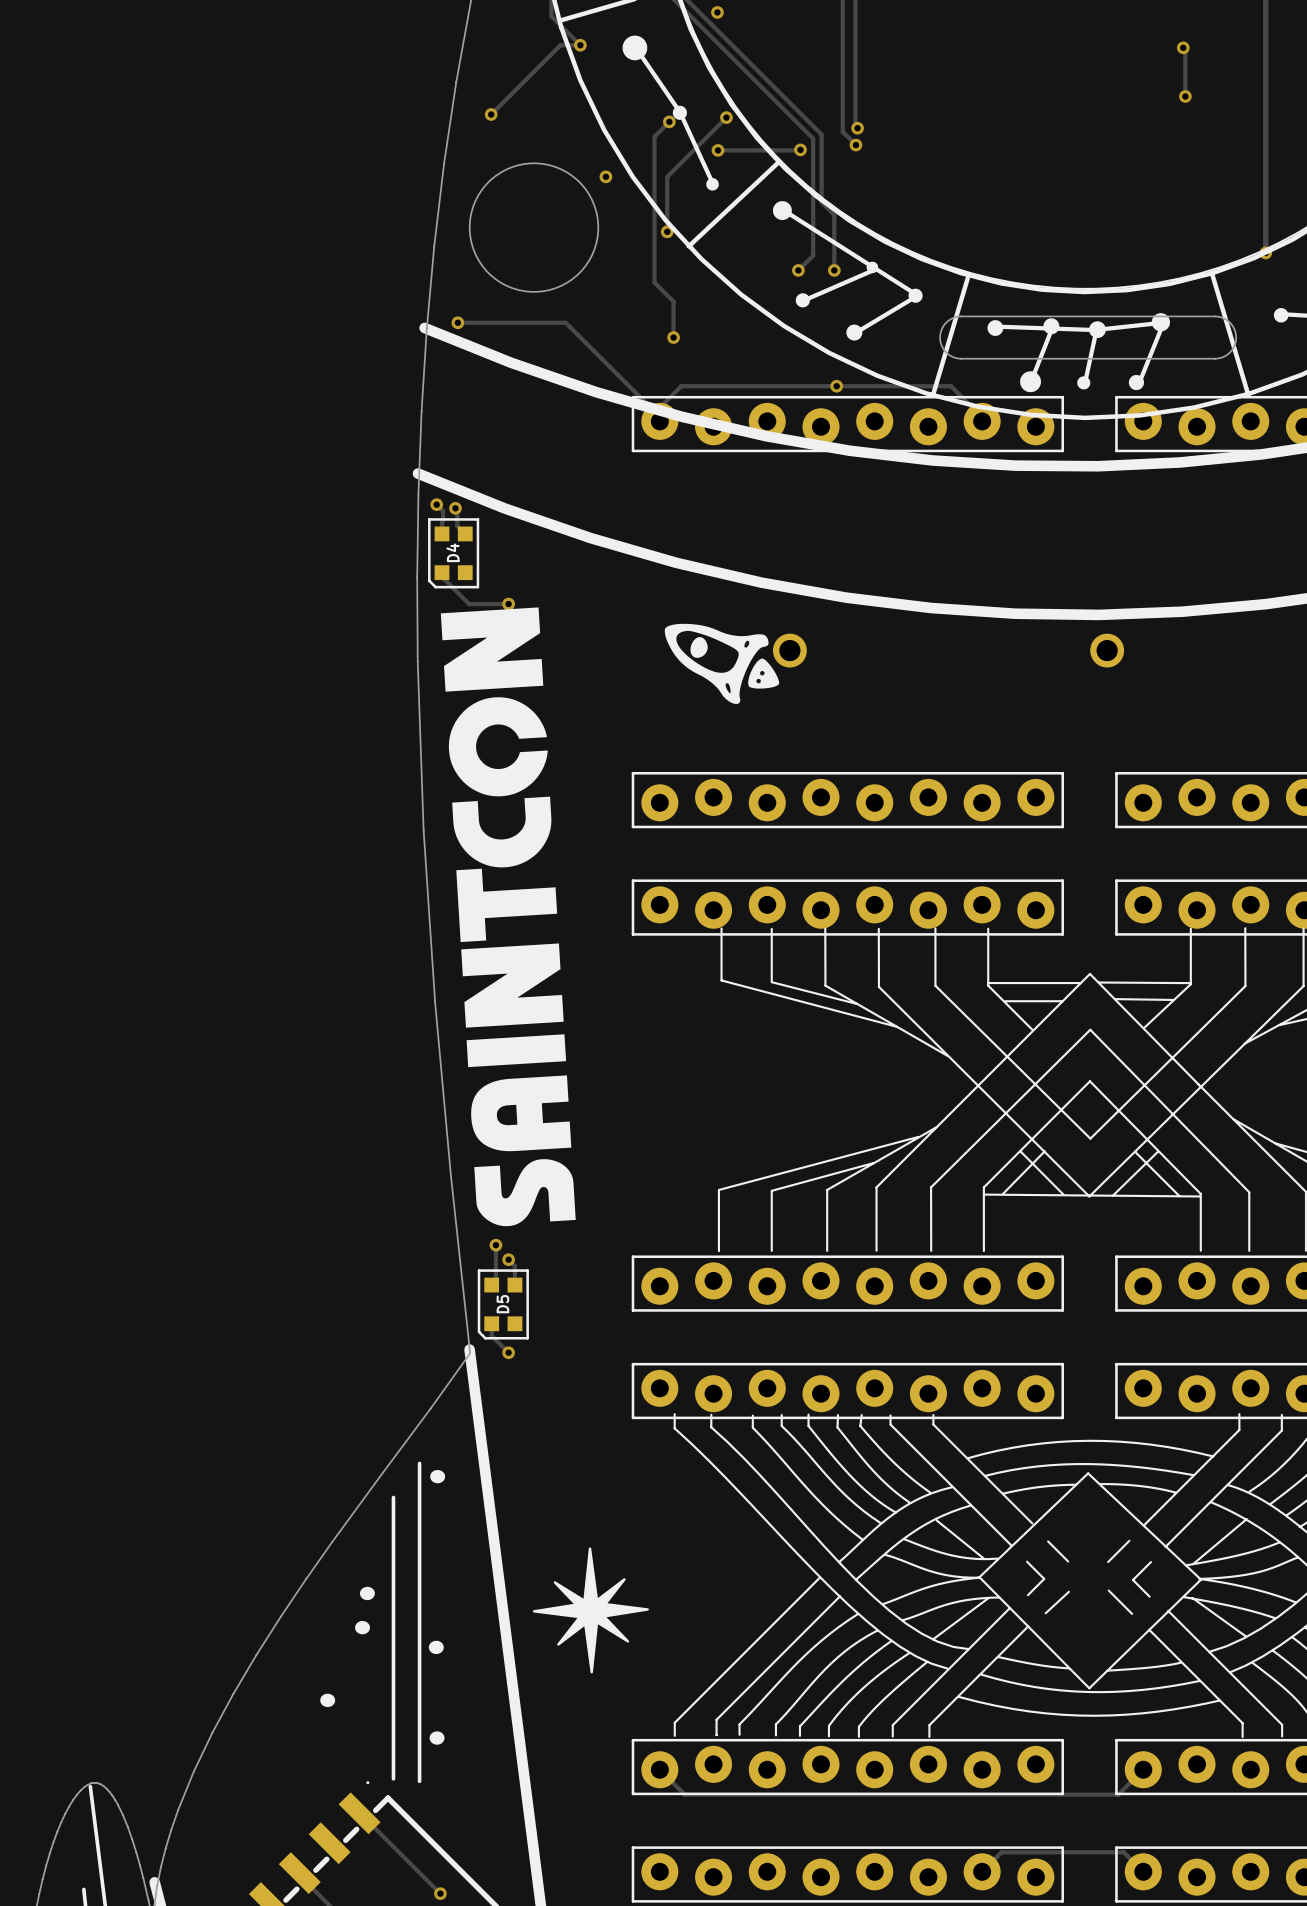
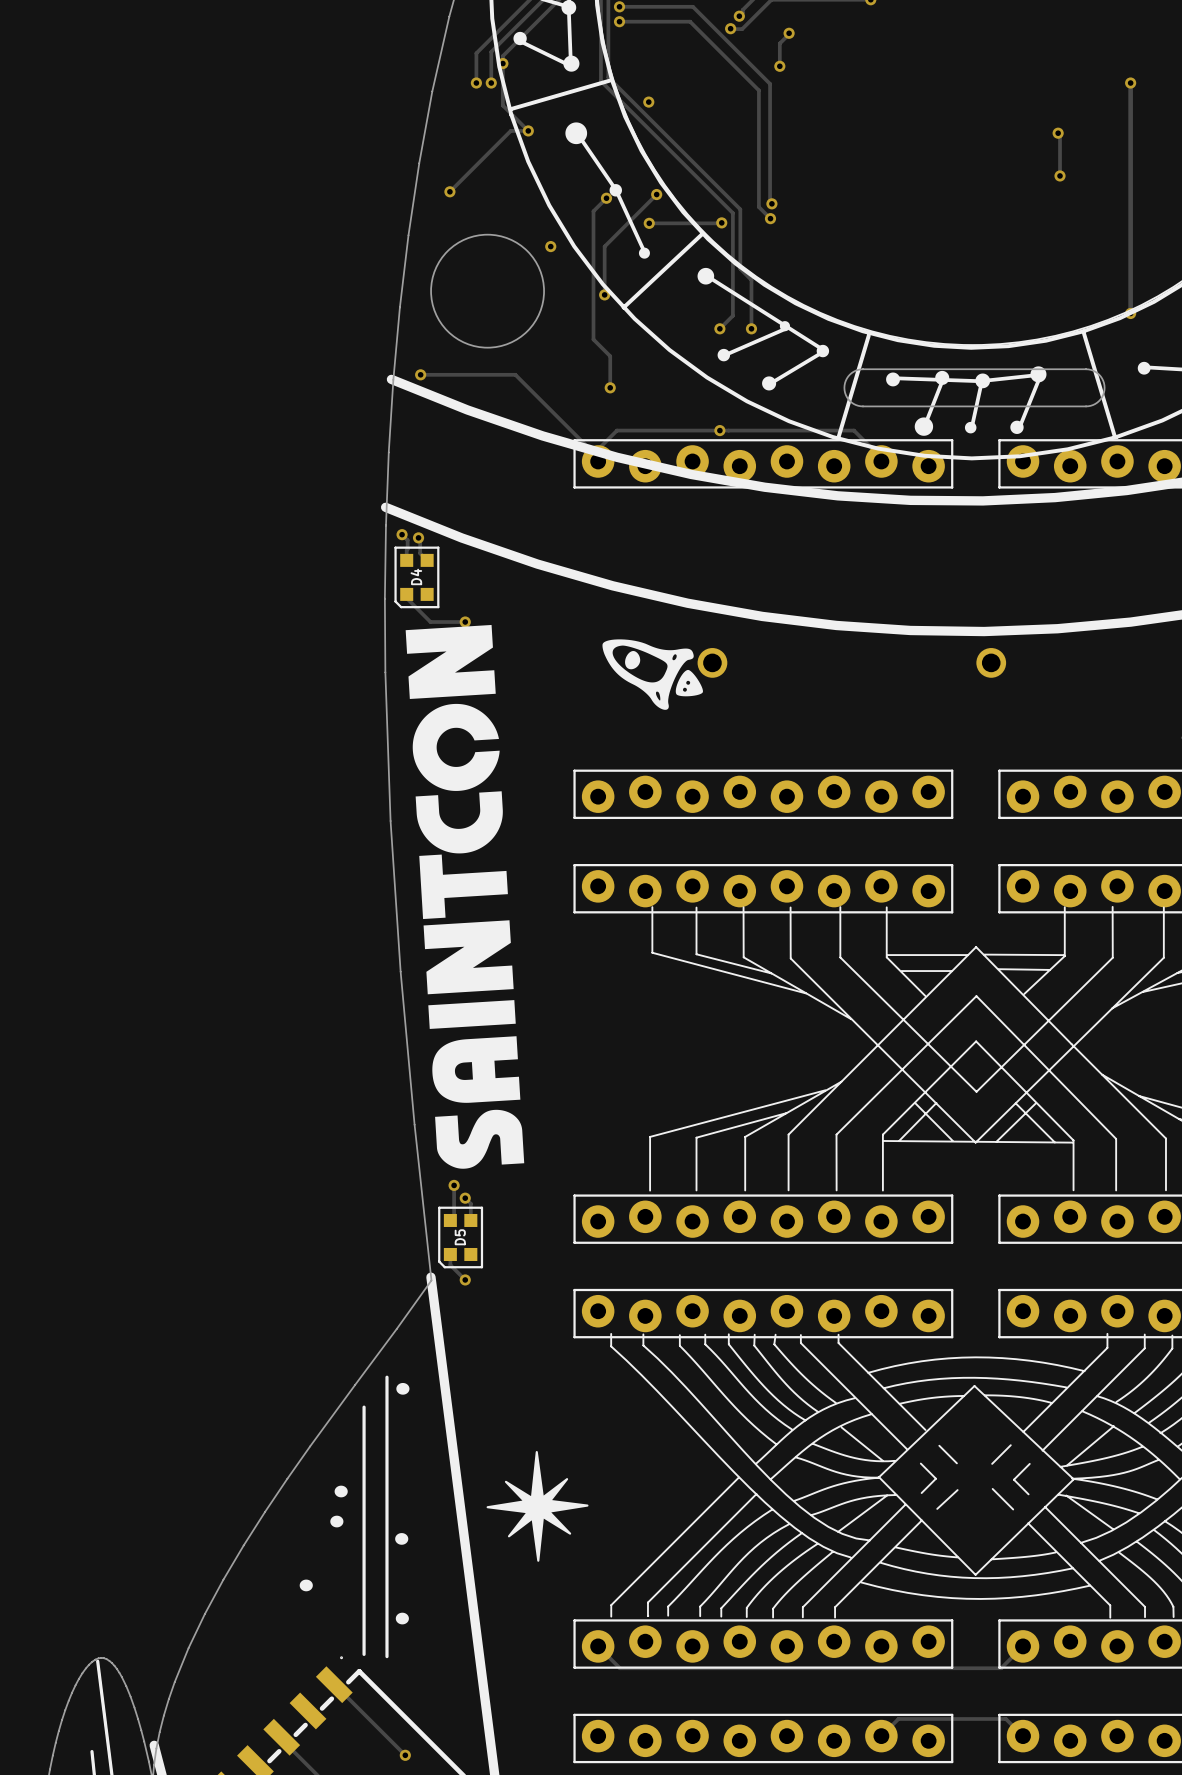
via position: (836, 386) -> (719, 430)

